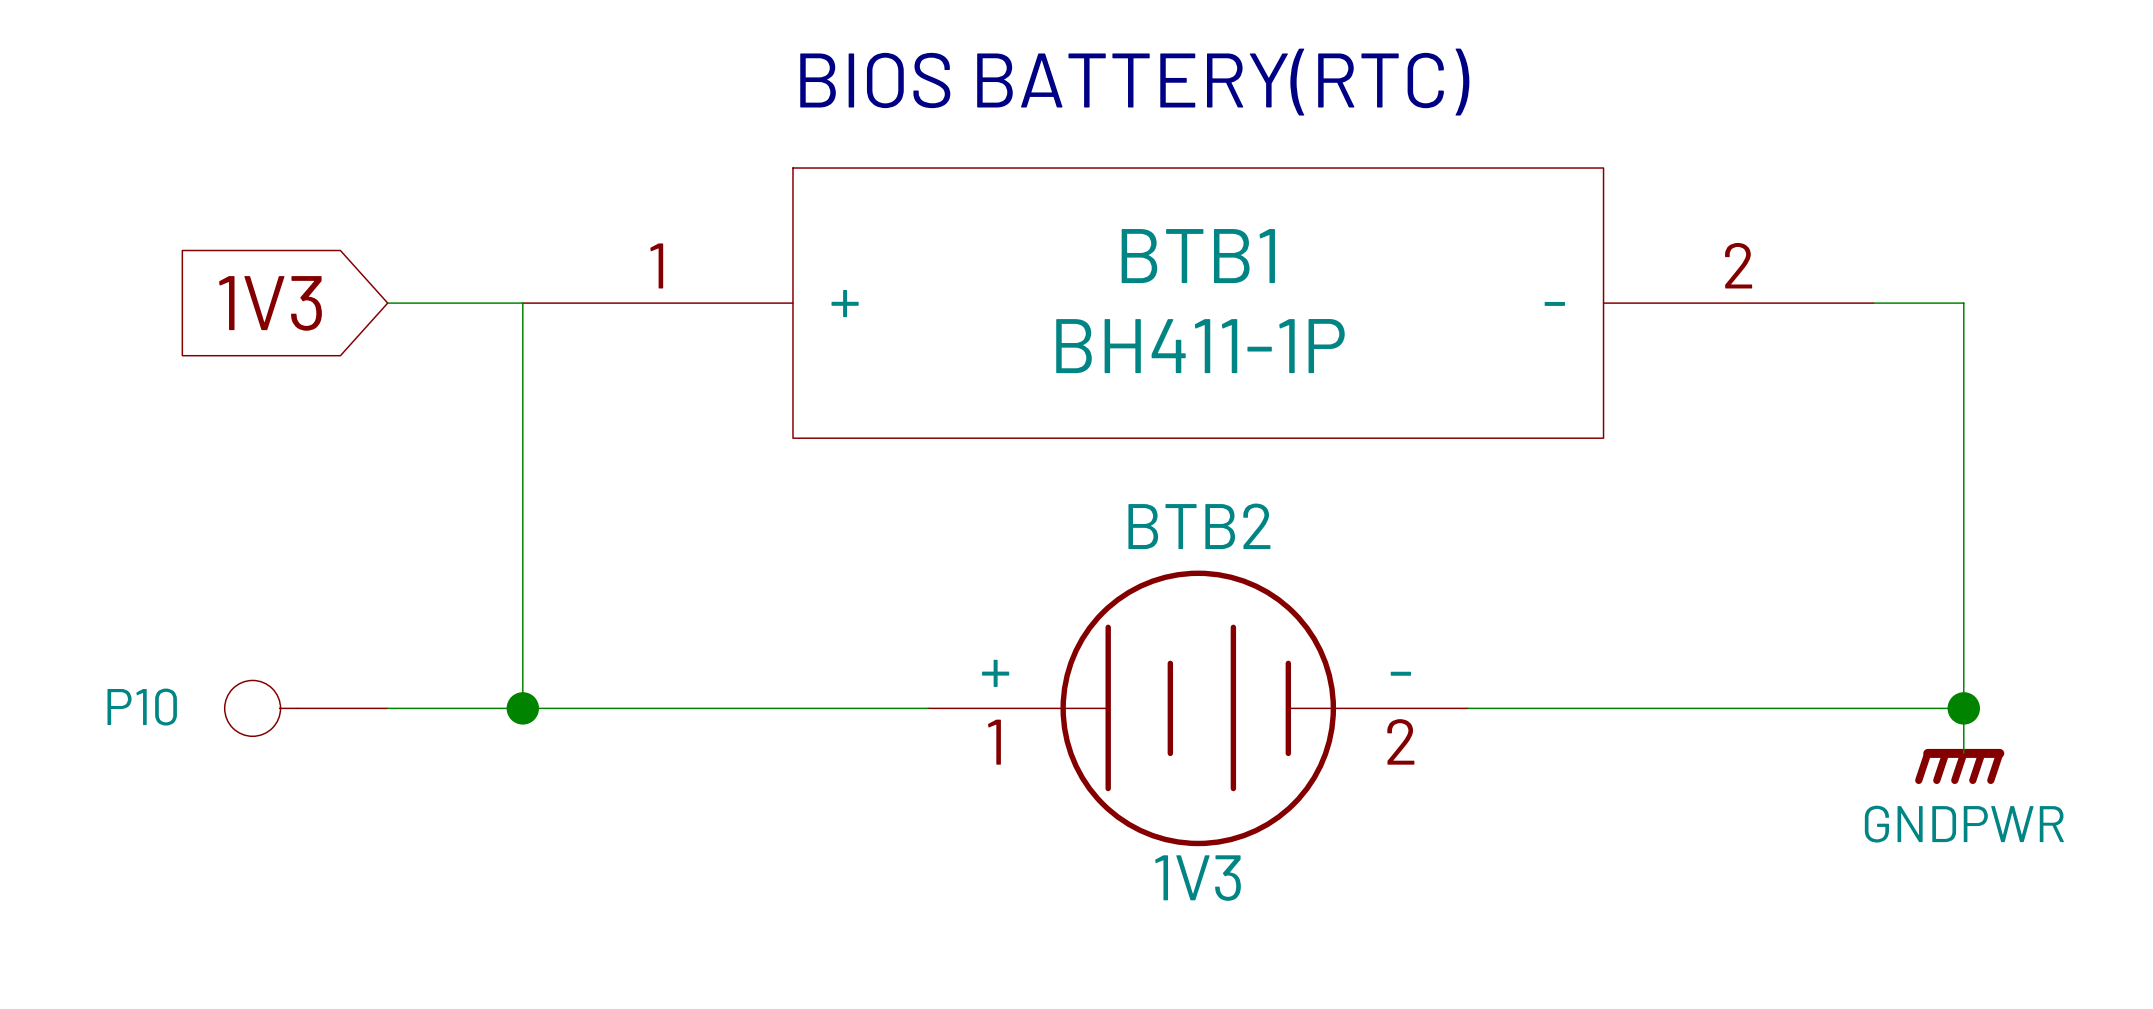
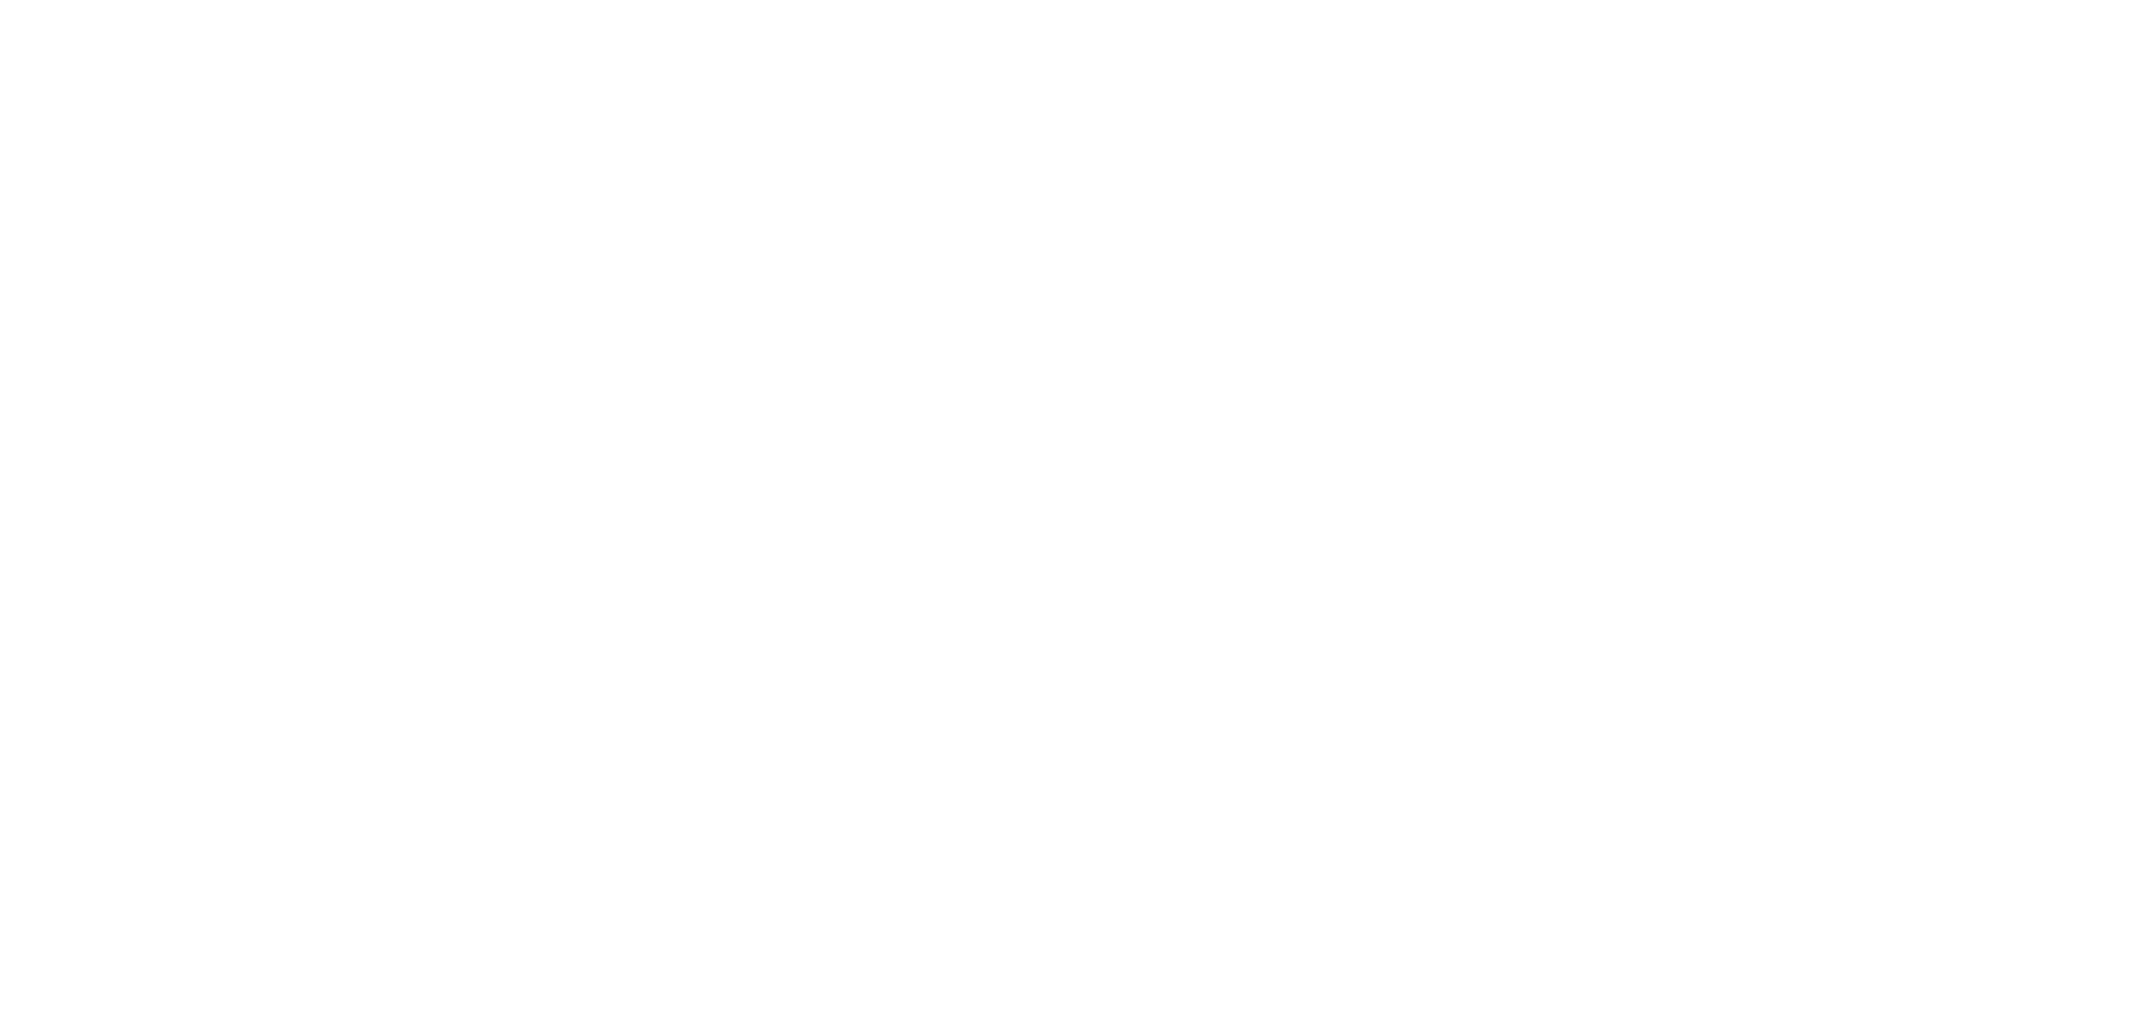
text: BIOS BATTERY(RTC) (1134, 82) -> none
global label: 1V3 (270, 303) -> none
wire: (387, 303) (522, 303) (522, 708) -> none
BTB1: BH411-1P (1198, 303) -> none
wire: (1873, 303) (1963, 303) (1963, 753) -> none
P10: (306, 708) -> none
wire: (387, 708) (928, 708) -> none
junction: (522, 708) -> none
BTB2: 1V3 (1198, 708) -> none
wire: (1468, 708) (1963, 708) -> none
junction: (1963, 708) -> none
power symbol: GNDPWR (1959, 766) -> none

